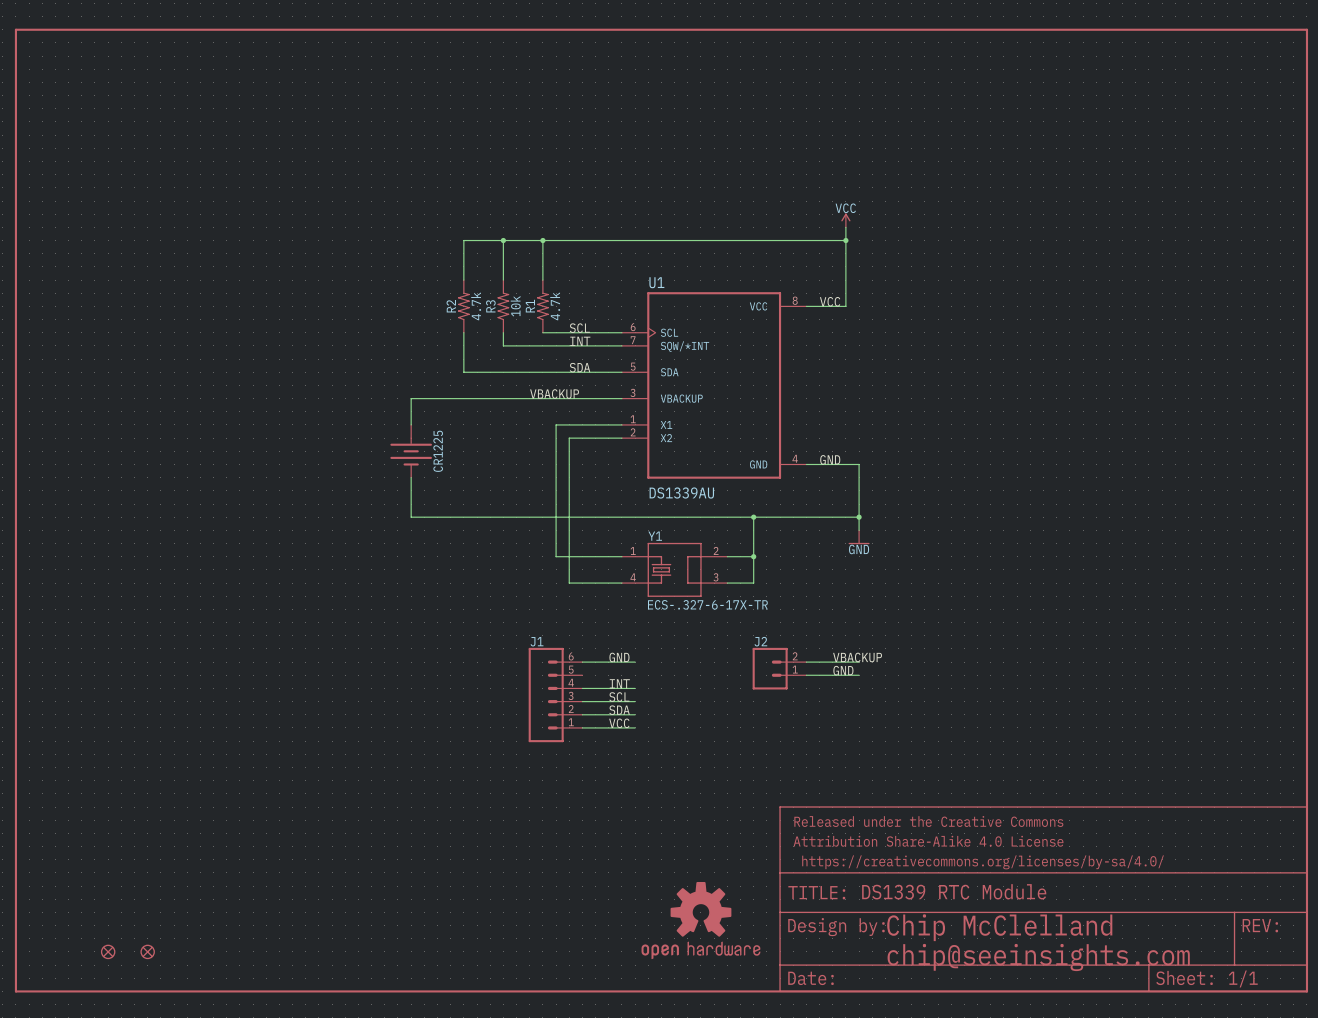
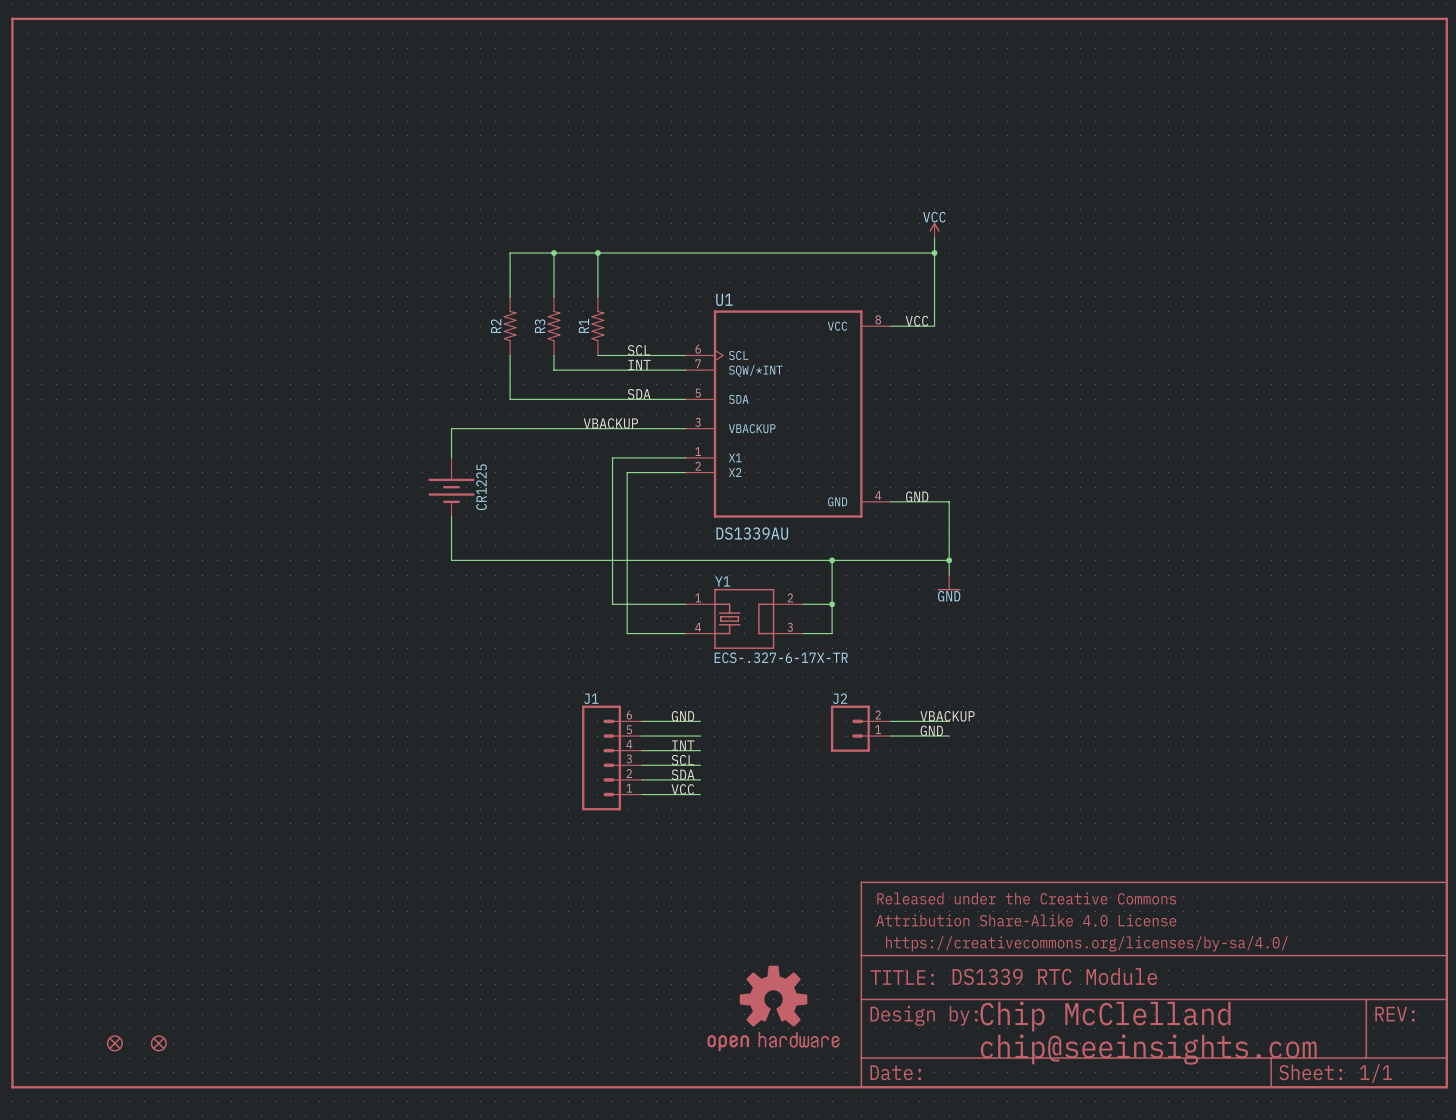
R2 value: 4.7k (476, 306) -> none
R3 value: 10k (515, 306) -> none
R1 value: 4.7k (555, 306) -> none
wire: none -> (641, 736) (700, 736)

